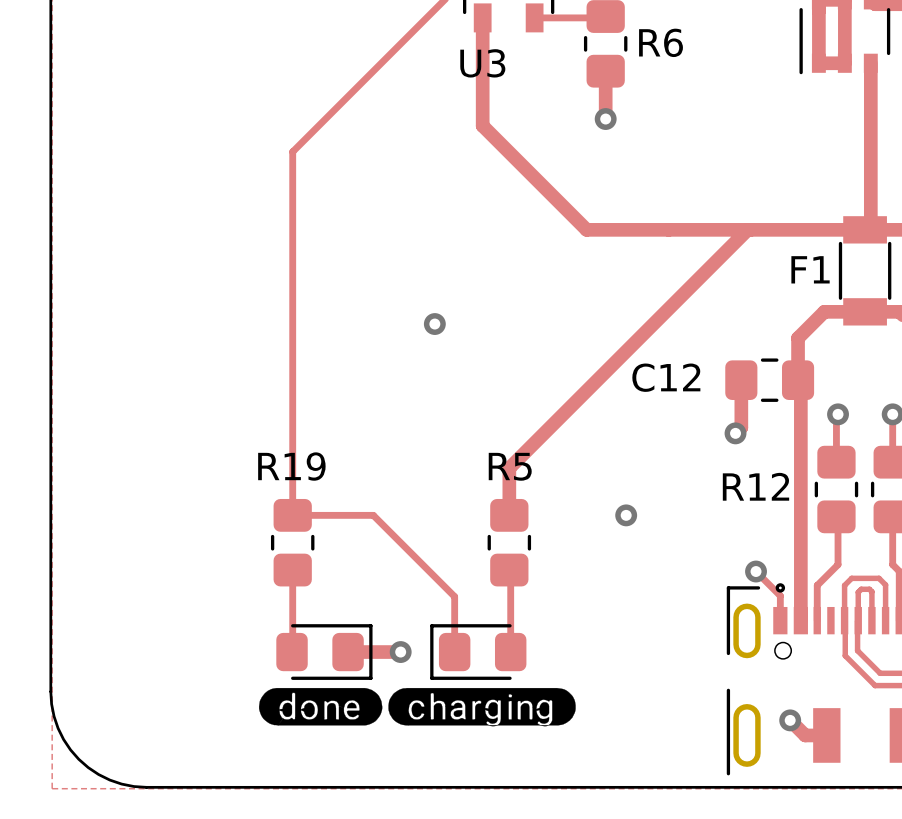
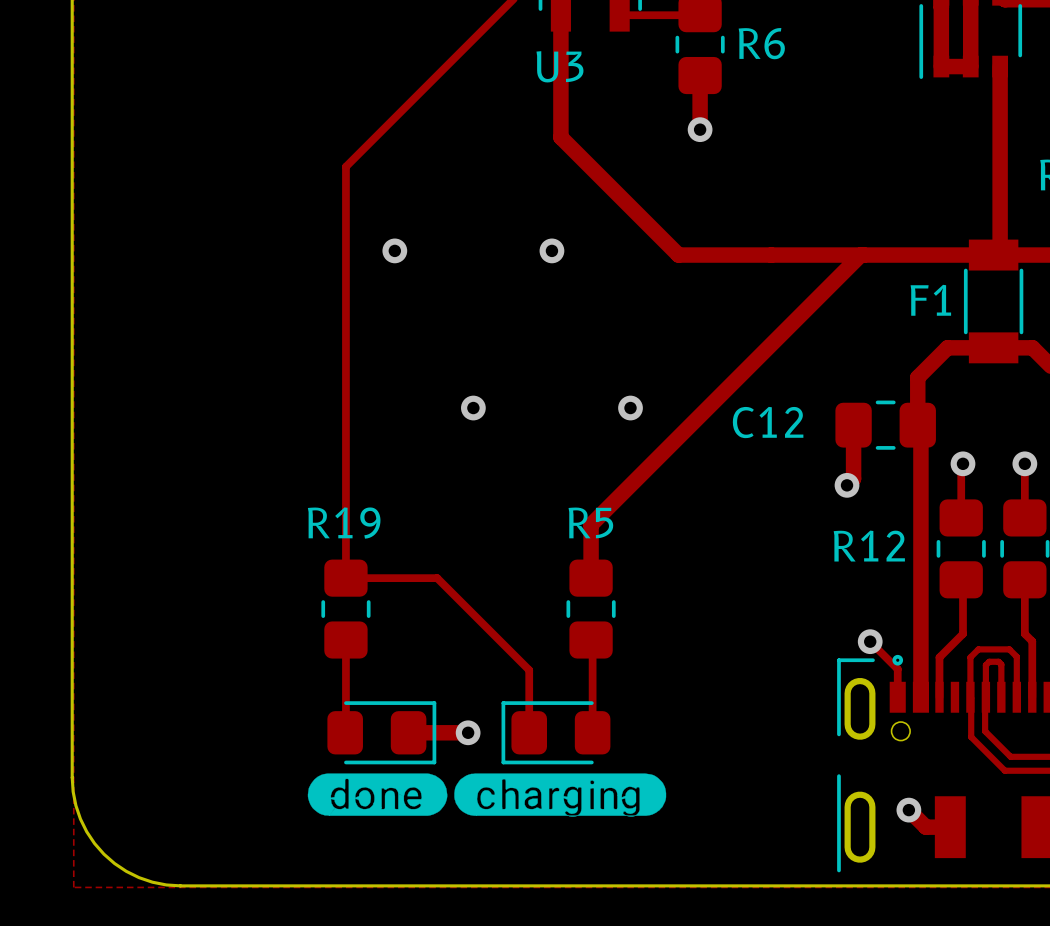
via: none -> (394, 250)
via: none -> (551, 250)
via position: (434, 324) -> (473, 408)
via: none -> (630, 408)
via: (626, 515) -> none

